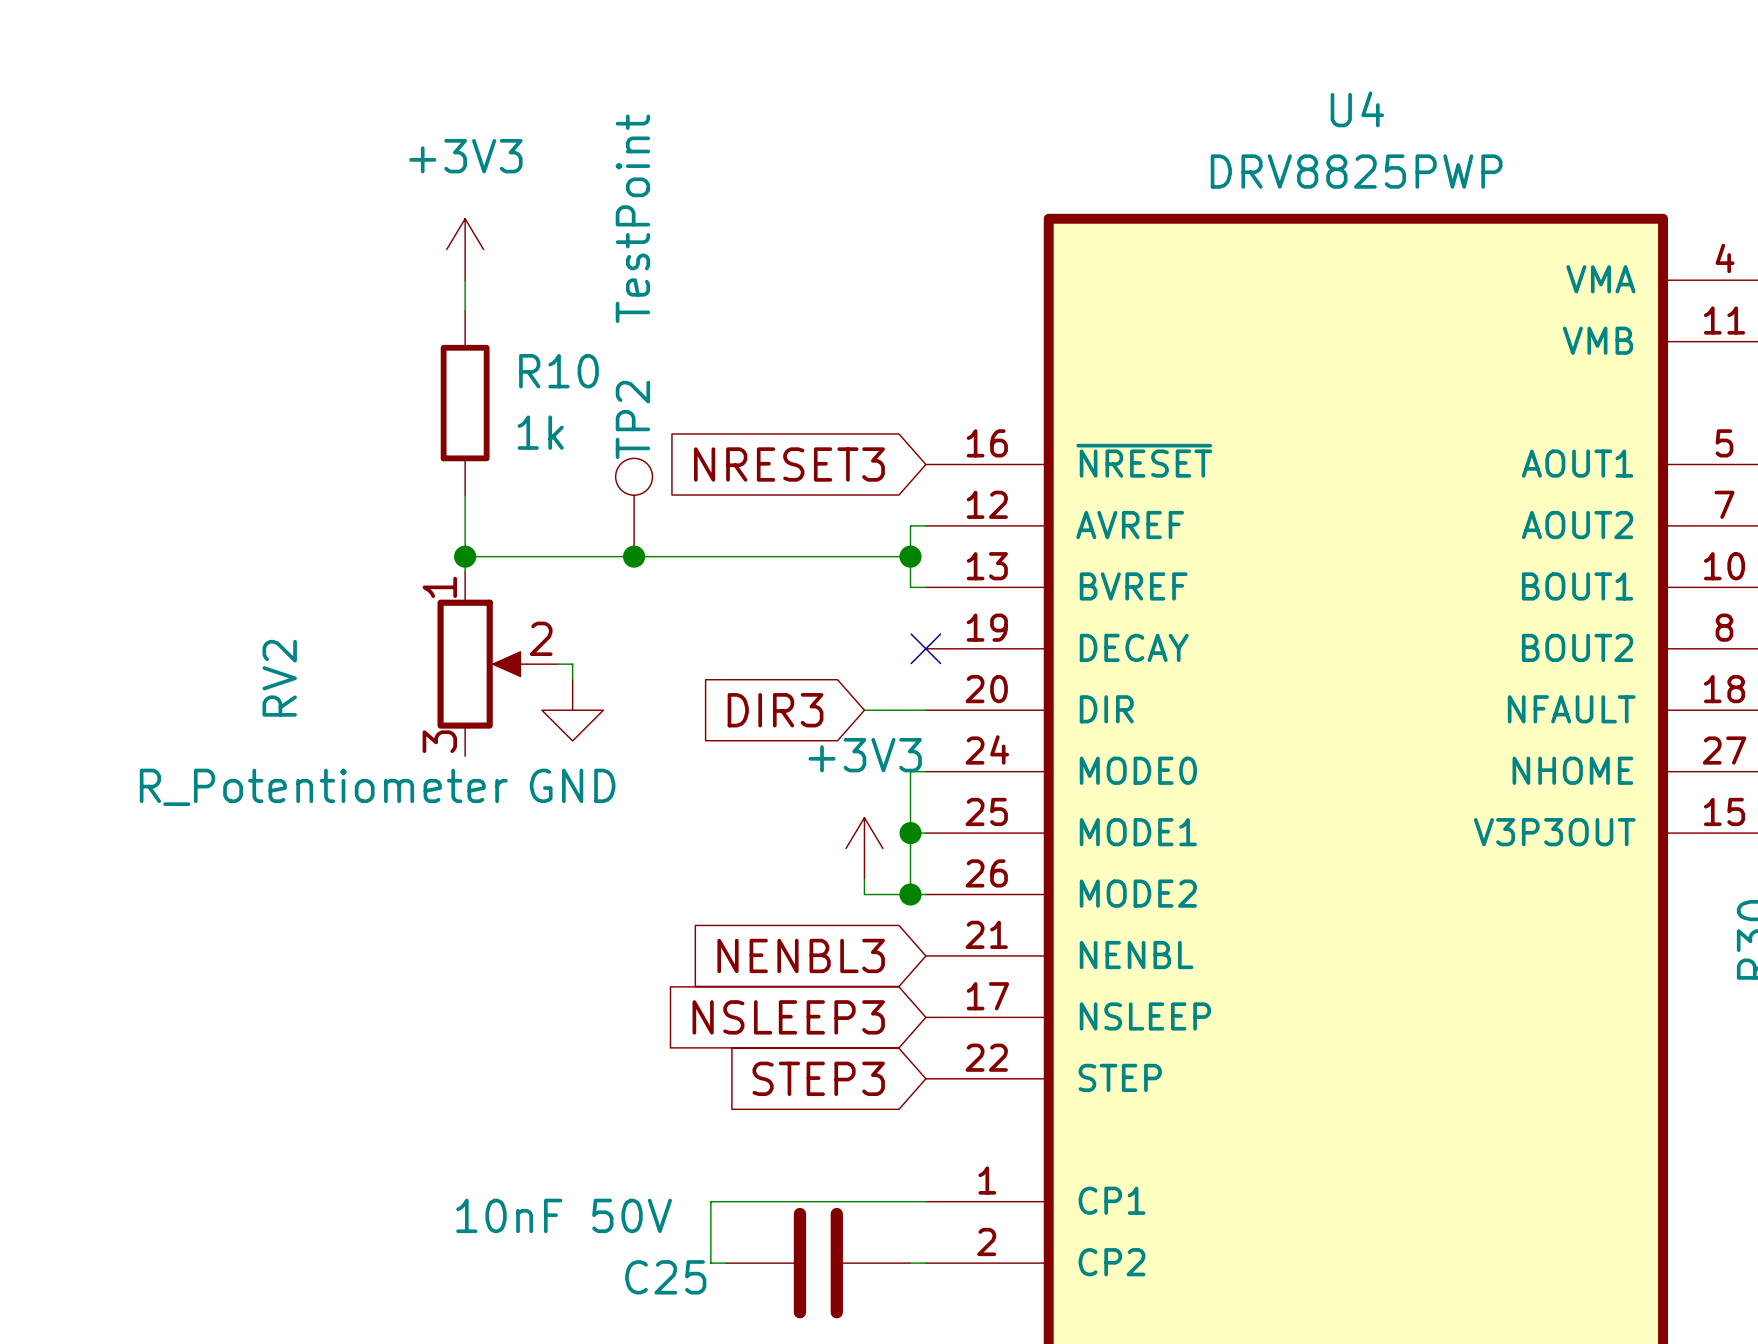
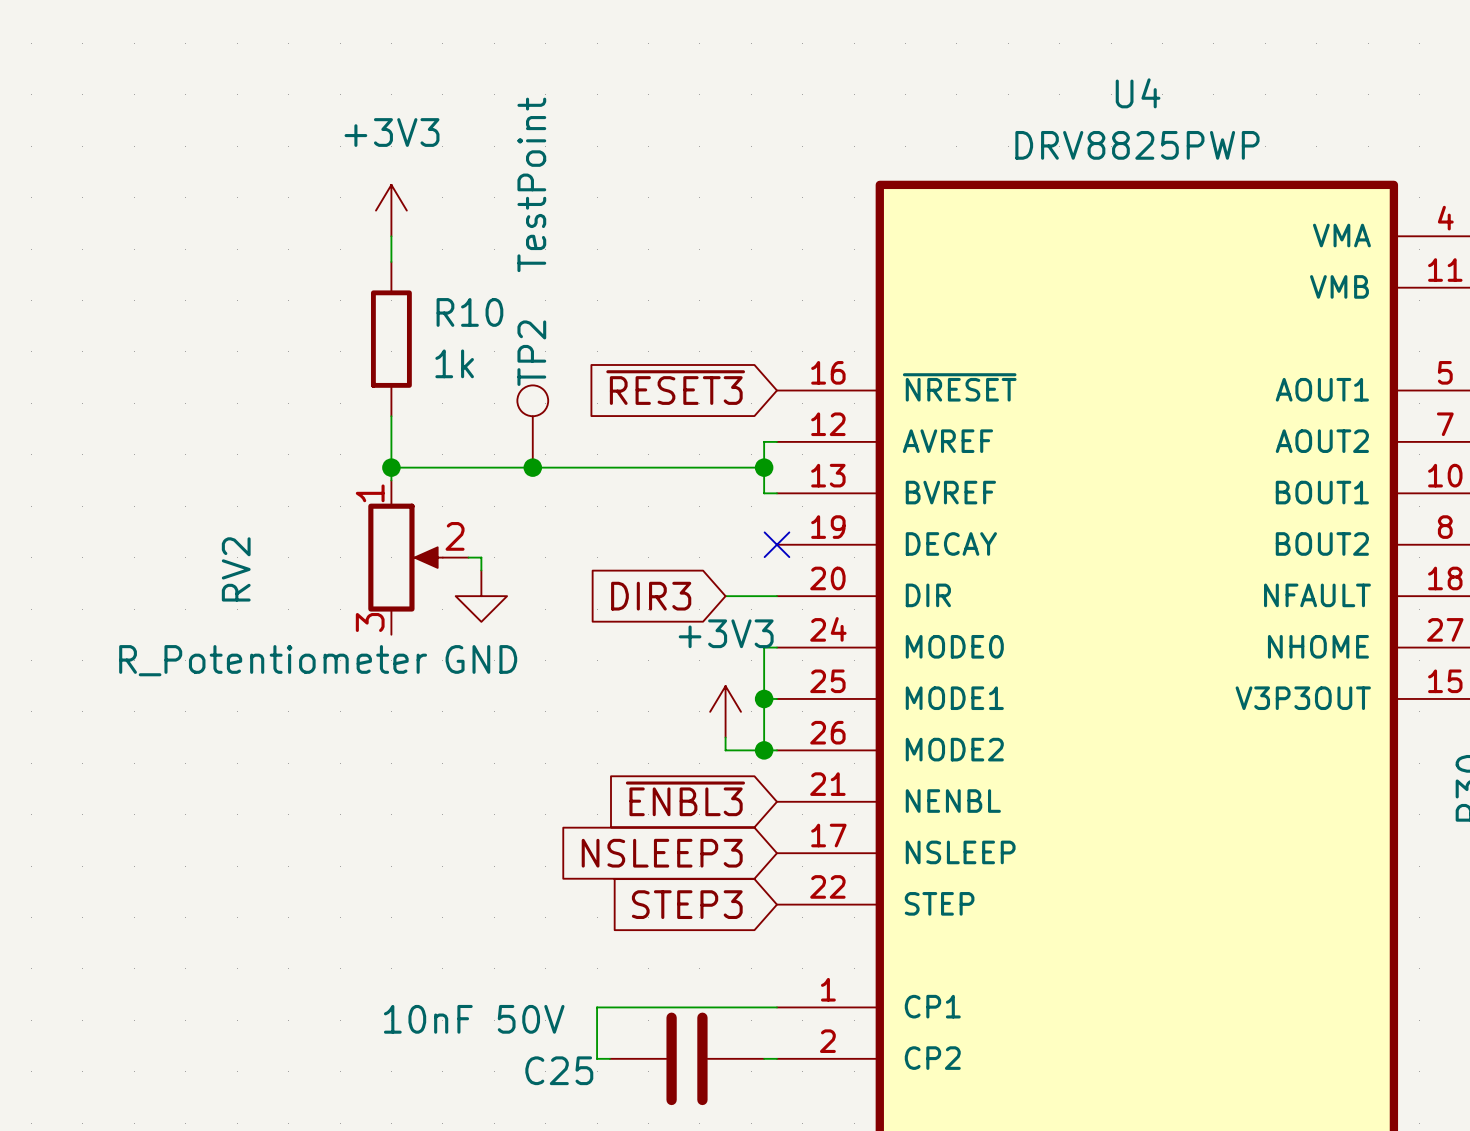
global label: NRESET3 (789, 464) -> ~{RESET3} (675, 387)
global label: NENBL3 (801, 955) -> ~{ENBL3} (685, 798)

